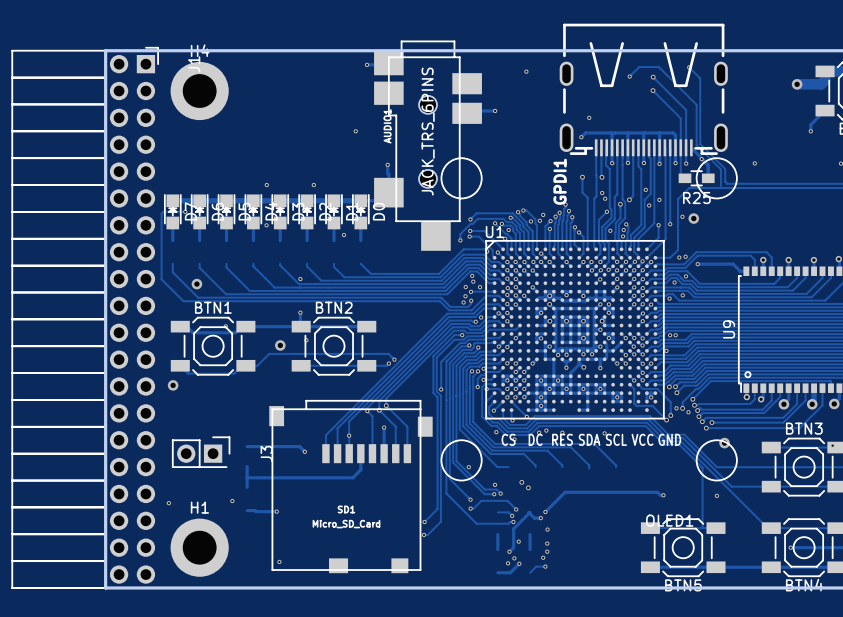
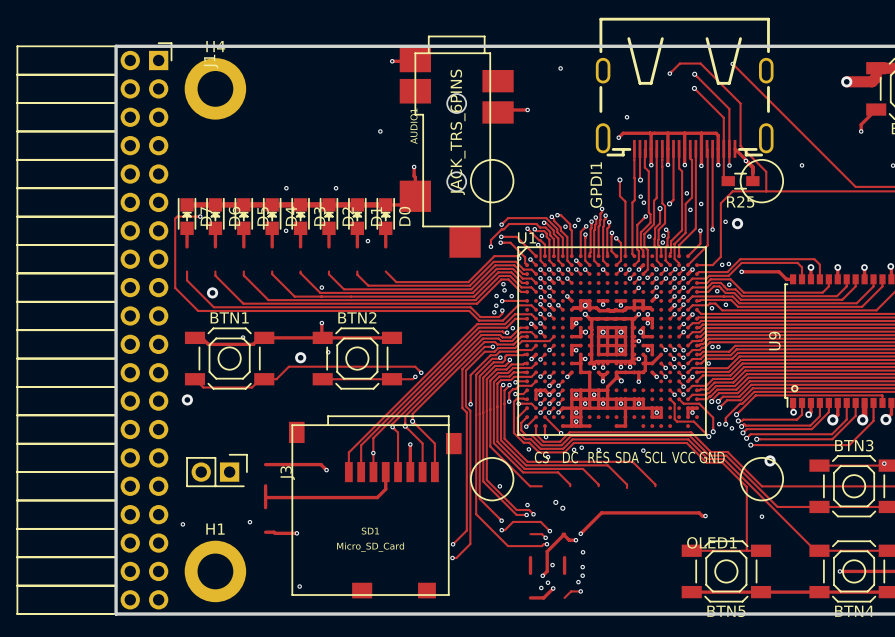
track: (700, 78) (700, 143) (725, 168) (725, 181) (727, 183) (805, 183) -> (744, 75) (855, 186)

